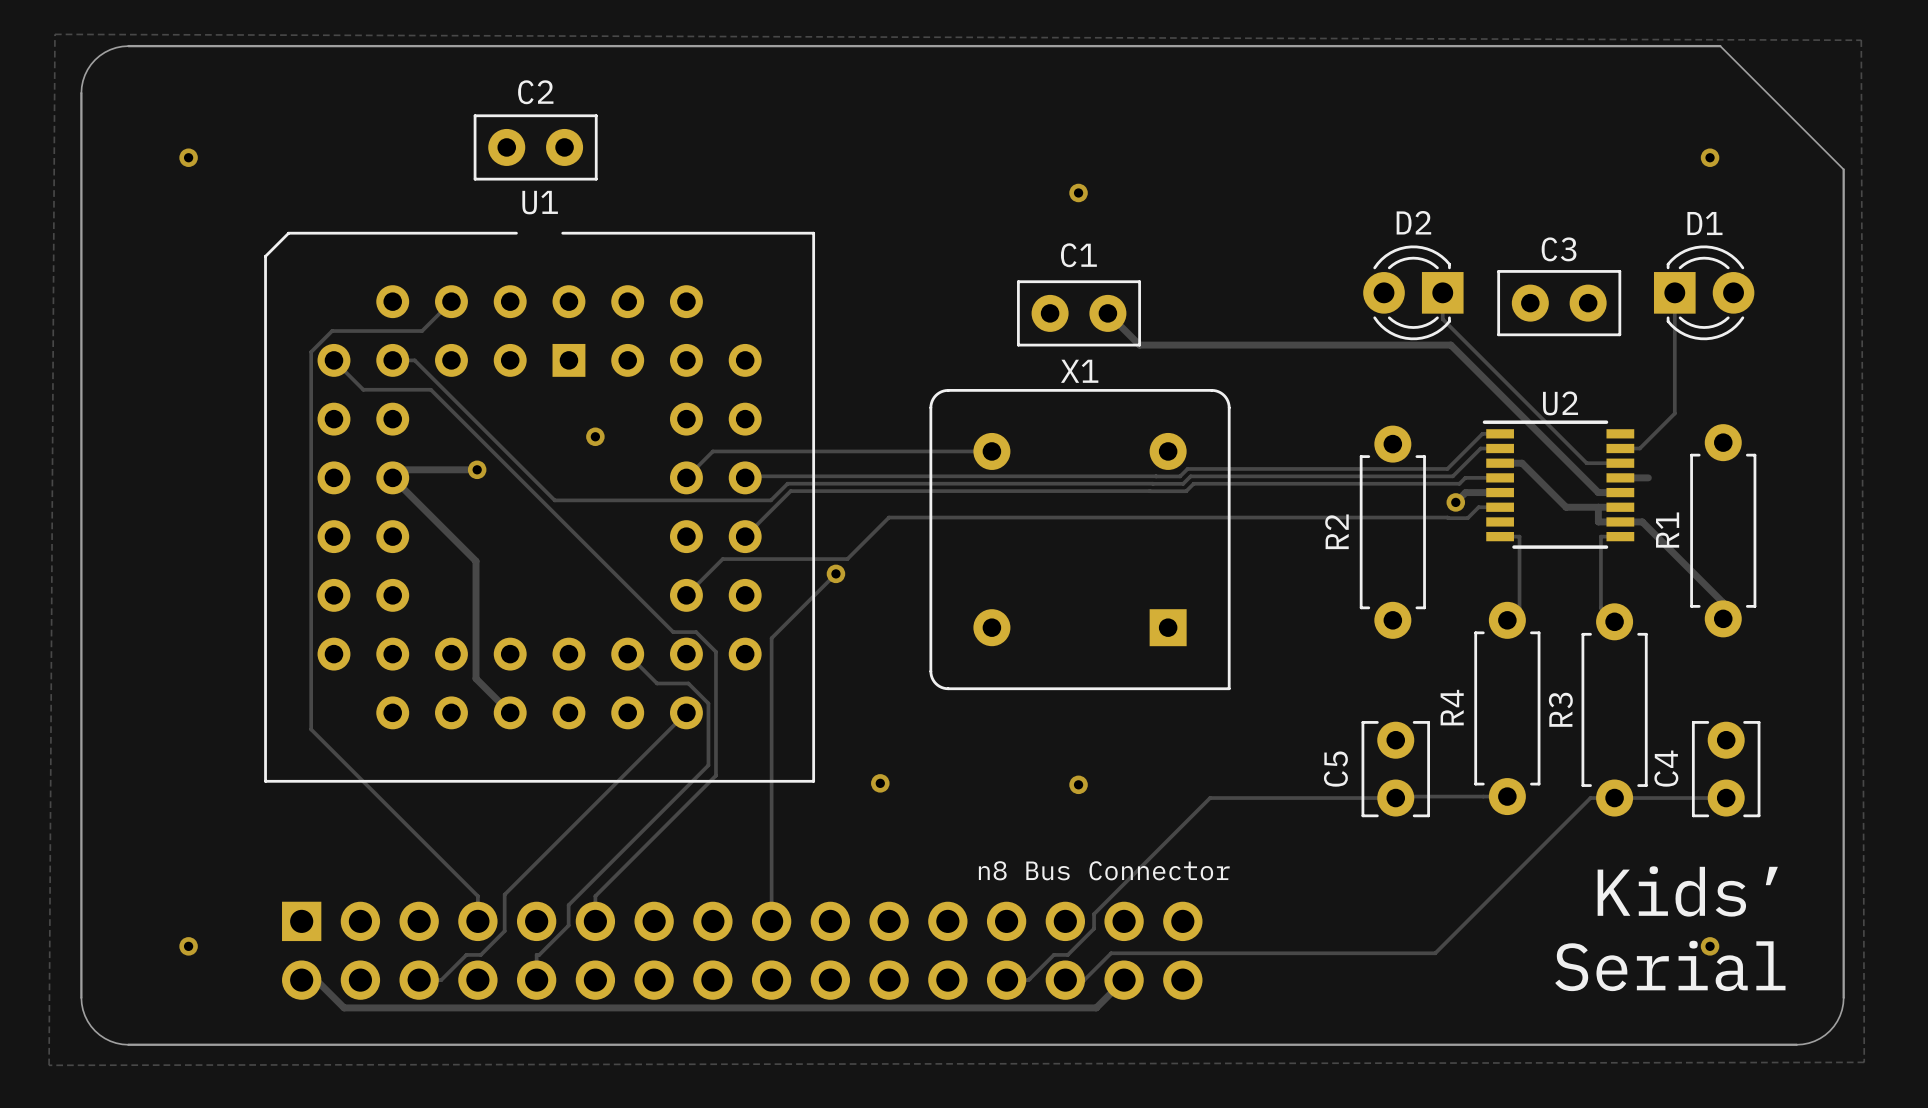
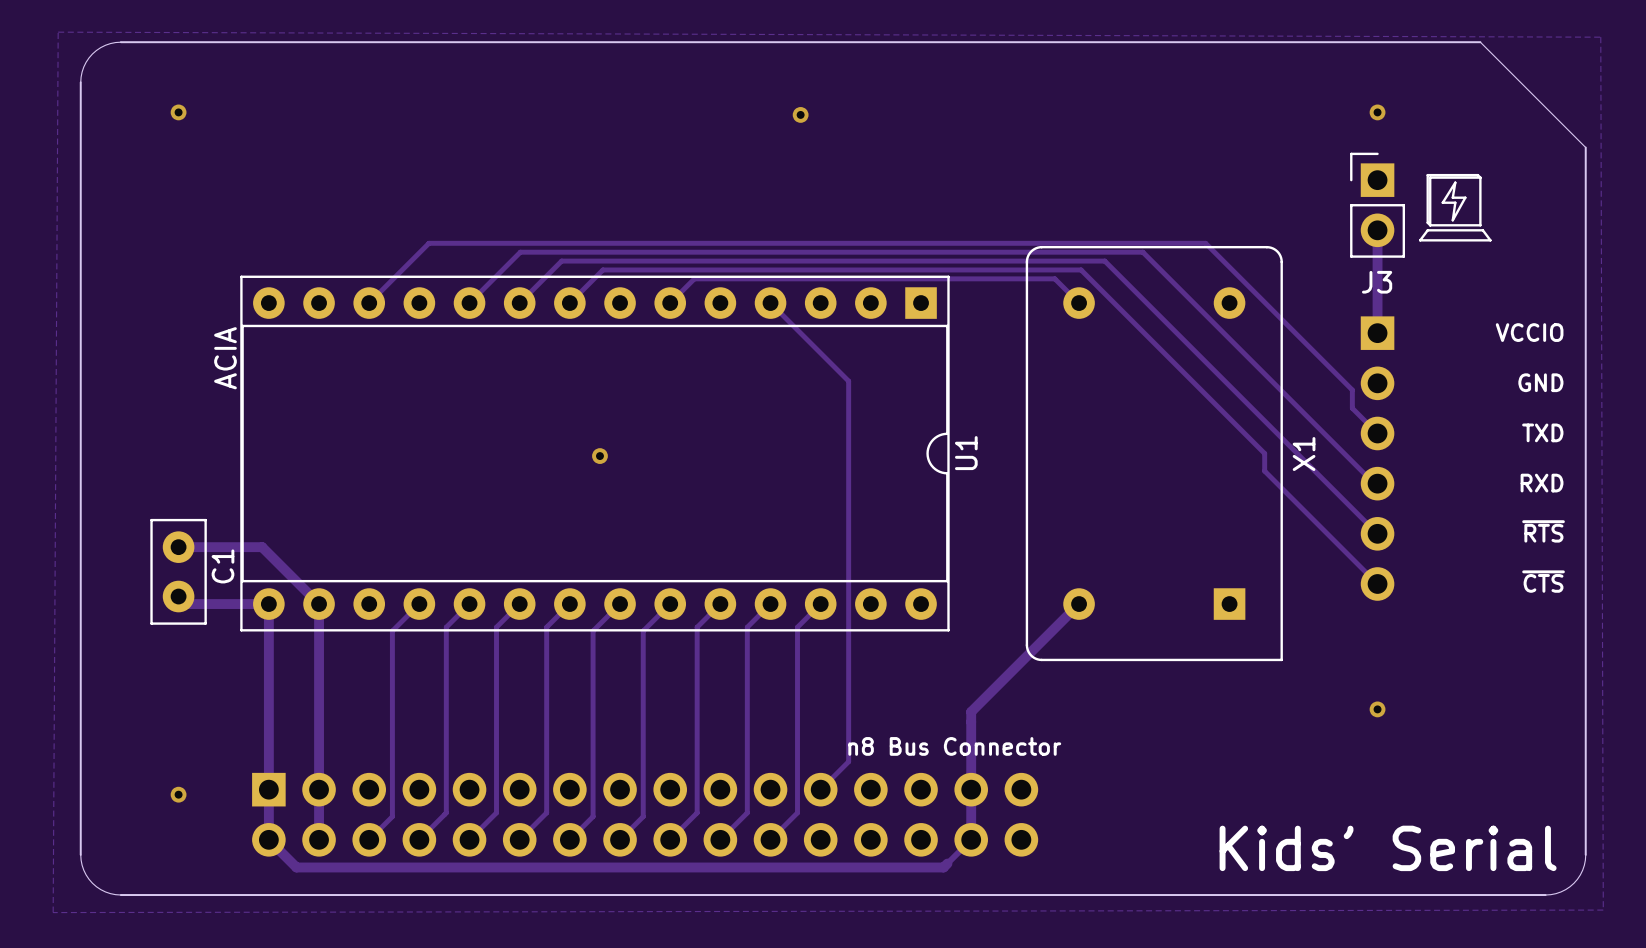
via: none -> (800, 114)
C2: (535, 147) -> none
via position: (188, 157) -> (178, 112)
via position: (1710, 157) -> (1377, 112)
via: (1078, 192) -> none
U1 name position: U1 (540, 202) -> U1 (966, 453)
line: none -> (1480, 177) (1477, 175) (1427, 175) (1427, 222) (1430, 225)
line: none -> (1480, 177) (1480, 225) (1430, 225)
line: none -> (1480, 177) (1430, 177) (1430, 225)
line: none -> (1455, 182) (1452, 197) (1465, 197) (1452, 220) (1455, 202) (1442, 202) (1455, 182)
U1 footprint: [264, 231, 816, 783] -> [240, 275, 950, 632]
J3: none -> (1377, 205)
line: none -> (1427, 230) (1420, 240) (1490, 240) (1482, 230) (1427, 230)
track: none -> (1377, 232) (1377, 333)
D2: (1413, 292) -> none
track: (1442, 292) (1442, 319) (1586, 463) (1620, 463) -> none
track: (1674, 292) (1674, 413) (1639, 448) (1620, 448) -> none
D1: (1704, 292) -> none
track: (451, 301) (422, 331) (332, 331) (311, 352) (311, 729) (477, 896) (477, 921) -> none
C3: (1559, 303) -> none
C1 rotation: 0° (1079, 313) -> 90° clockwise (178, 571)
C1 position: (1079, 313) -> (178, 571)
track: (1107, 313) (1139, 345) (1450, 345) (1598, 492) (1620, 492) -> none
track: none -> (369, 303) (428, 243) (1205, 243) (1352, 390) (1352, 408) (1377, 433)
track: none -> (469, 303) (520, 252) (1142, 252) (1374, 483) (1377, 483)
track: none -> (519, 303) (561, 261) (1104, 261) (1377, 533)
track: none -> (569, 303) (602, 269) (1081, 269) (1264, 453) (1264, 471) (1377, 583)
track: none -> (670, 303) (694, 278) (1054, 278) (1079, 303)
track: none -> (770, 303) (848, 381) (848, 761) (820, 789)
track: (333, 360) (363, 389) (430, 389) (673, 632) (696, 632) (715, 651) (715, 775) (595, 896) (595, 921) -> none
track: (392, 360) (414, 360) (554, 500) (770, 500) (787, 483) (1152, 483) -> none
X1 name position: X1 (1079, 371) -> X1 (1304, 454)
text: none -> VCCIO (1529, 332)
X1 footprint: [929, 389, 1231, 691] -> [1025, 245, 1283, 662]
text: none -> ACIA (225, 358)
track: (1500, 433) (1482, 433) (1447, 468) (1187, 468) (1180, 476) (1156, 476) -> none
via: (595, 436) -> none
text: none -> GND (1540, 382)
track: (1500, 448) (1480, 448) (1452, 476) (1190, 476) (1183, 483) (1153, 483) -> none
track: (991, 451) (712, 451) (686, 477) -> none
track: (1500, 463) (1522, 463) (1566, 507) (1620, 507) -> none
track: (477, 469) (400, 469) (392, 477) (476, 561) (476, 678) (510, 712) -> none
via: (477, 469) -> none
track: (1156, 476) (746, 476) (745, 477) -> none
track: (1500, 477) (1465, 477) (1459, 483) (1193, 483) (1186, 491) (1150, 491) -> none
track: (1620, 477) (1648, 477) -> none
U2: (1558, 484) -> none
track: (1149, 491) (790, 491) (745, 536) -> none
track: (1500, 492) (1465, 492) (1455, 502) -> none
via: (1455, 502) -> none
text: none -> TXD (1542, 432)
track: (1500, 507) (1478, 507) (1467, 518) (888, 517) (847, 559) (722, 559) (686, 595) -> none
track: (1598, 507) (1598, 521) (1642, 521) (1723, 602) (1723, 618) -> none
via: none -> (599, 456)
R1: (1723, 530) -> none
R2: (1392, 532) -> none
part: none -> (1377, 458)
track: (1500, 536) (1519, 536) (1519, 608) (1507, 620) -> none
track: (1620, 536) (1600, 536) (1600, 608) (1614, 621) -> none
text: none -> RXD (1542, 483)
track: (835, 573) (771, 638) (771, 921) -> none
via: (835, 573) -> none
text: none -> ~{RTS} (1543, 531)
track: none -> (178, 547) (262, 547) (319, 604) (319, 839)
track: (627, 654) (657, 683) (688, 683) (708, 703) (708, 765) (568, 905) (568, 925) (539, 954) (536, 954) (536, 980) -> (519, 604) (496, 627) (496, 812) (469, 839)
text: none -> ~{CTS} (1543, 581)
track: none -> (178, 596) (186, 604) (268, 604) (268, 779)
track: none -> (469, 604) (446, 627) (446, 812) (419, 839)
track: none -> (569, 604) (546, 627) (546, 812) (519, 839)
track: none -> (620, 604) (593, 631) (593, 816) (569, 839)
track: none -> (670, 604) (643, 631) (643, 816) (620, 839)
track: none -> (720, 604) (697, 627) (697, 812) (670, 839)
track: none -> (770, 604) (747, 627) (747, 812) (720, 839)
track: none -> (820, 604) (797, 627) (797, 812) (770, 839)
track: none -> (1079, 604) (971, 711) (971, 839)
R4: (1507, 708) -> none
R3: (1614, 709) -> none
track: (686, 712) (504, 894) (504, 931) (480, 954) (466, 954) (441, 980) (419, 980) -> (419, 604) (392, 631) (392, 816) (369, 839)
C5: (1395, 769) -> none
C4: (1726, 769) -> none
via: (880, 783) -> none
via: (1078, 784) -> none
track: (1507, 796) (1210, 798) (1094, 914) (1094, 928) (1067, 954) (1053, 954) (1028, 980) (1006, 980) -> none
track: (1726, 798) (1590, 798) (1435, 953) (1111, 953) (1084, 980) (1065, 980) -> none
via: none -> (1377, 709)
text: Kids’ (1687, 891) -> none
via position: (188, 946) -> (178, 794)
via: (1710, 946) -> none
text: Serial (1670, 965) -> Kids’ Serial (1388, 848)
track: (301, 980) (316, 980) (344, 1007) (1096, 1007) -> (268, 789) (268, 839) (296, 867) (943, 867) (947, 863)

